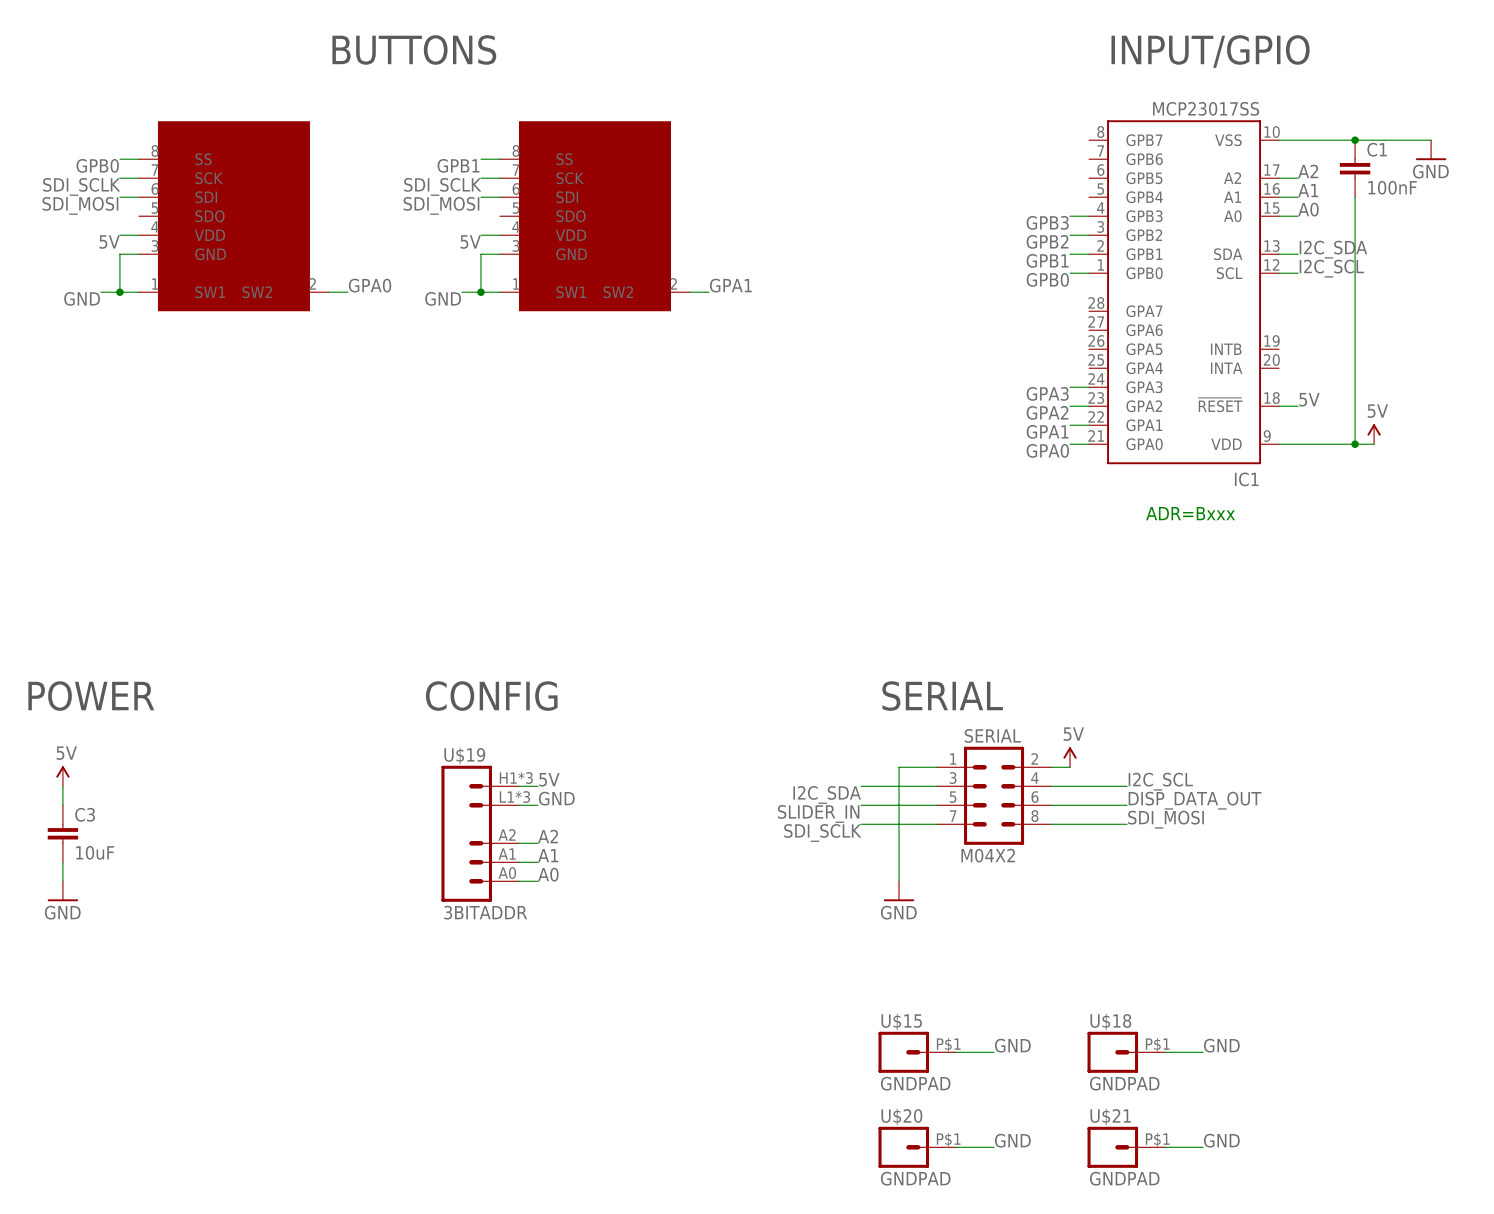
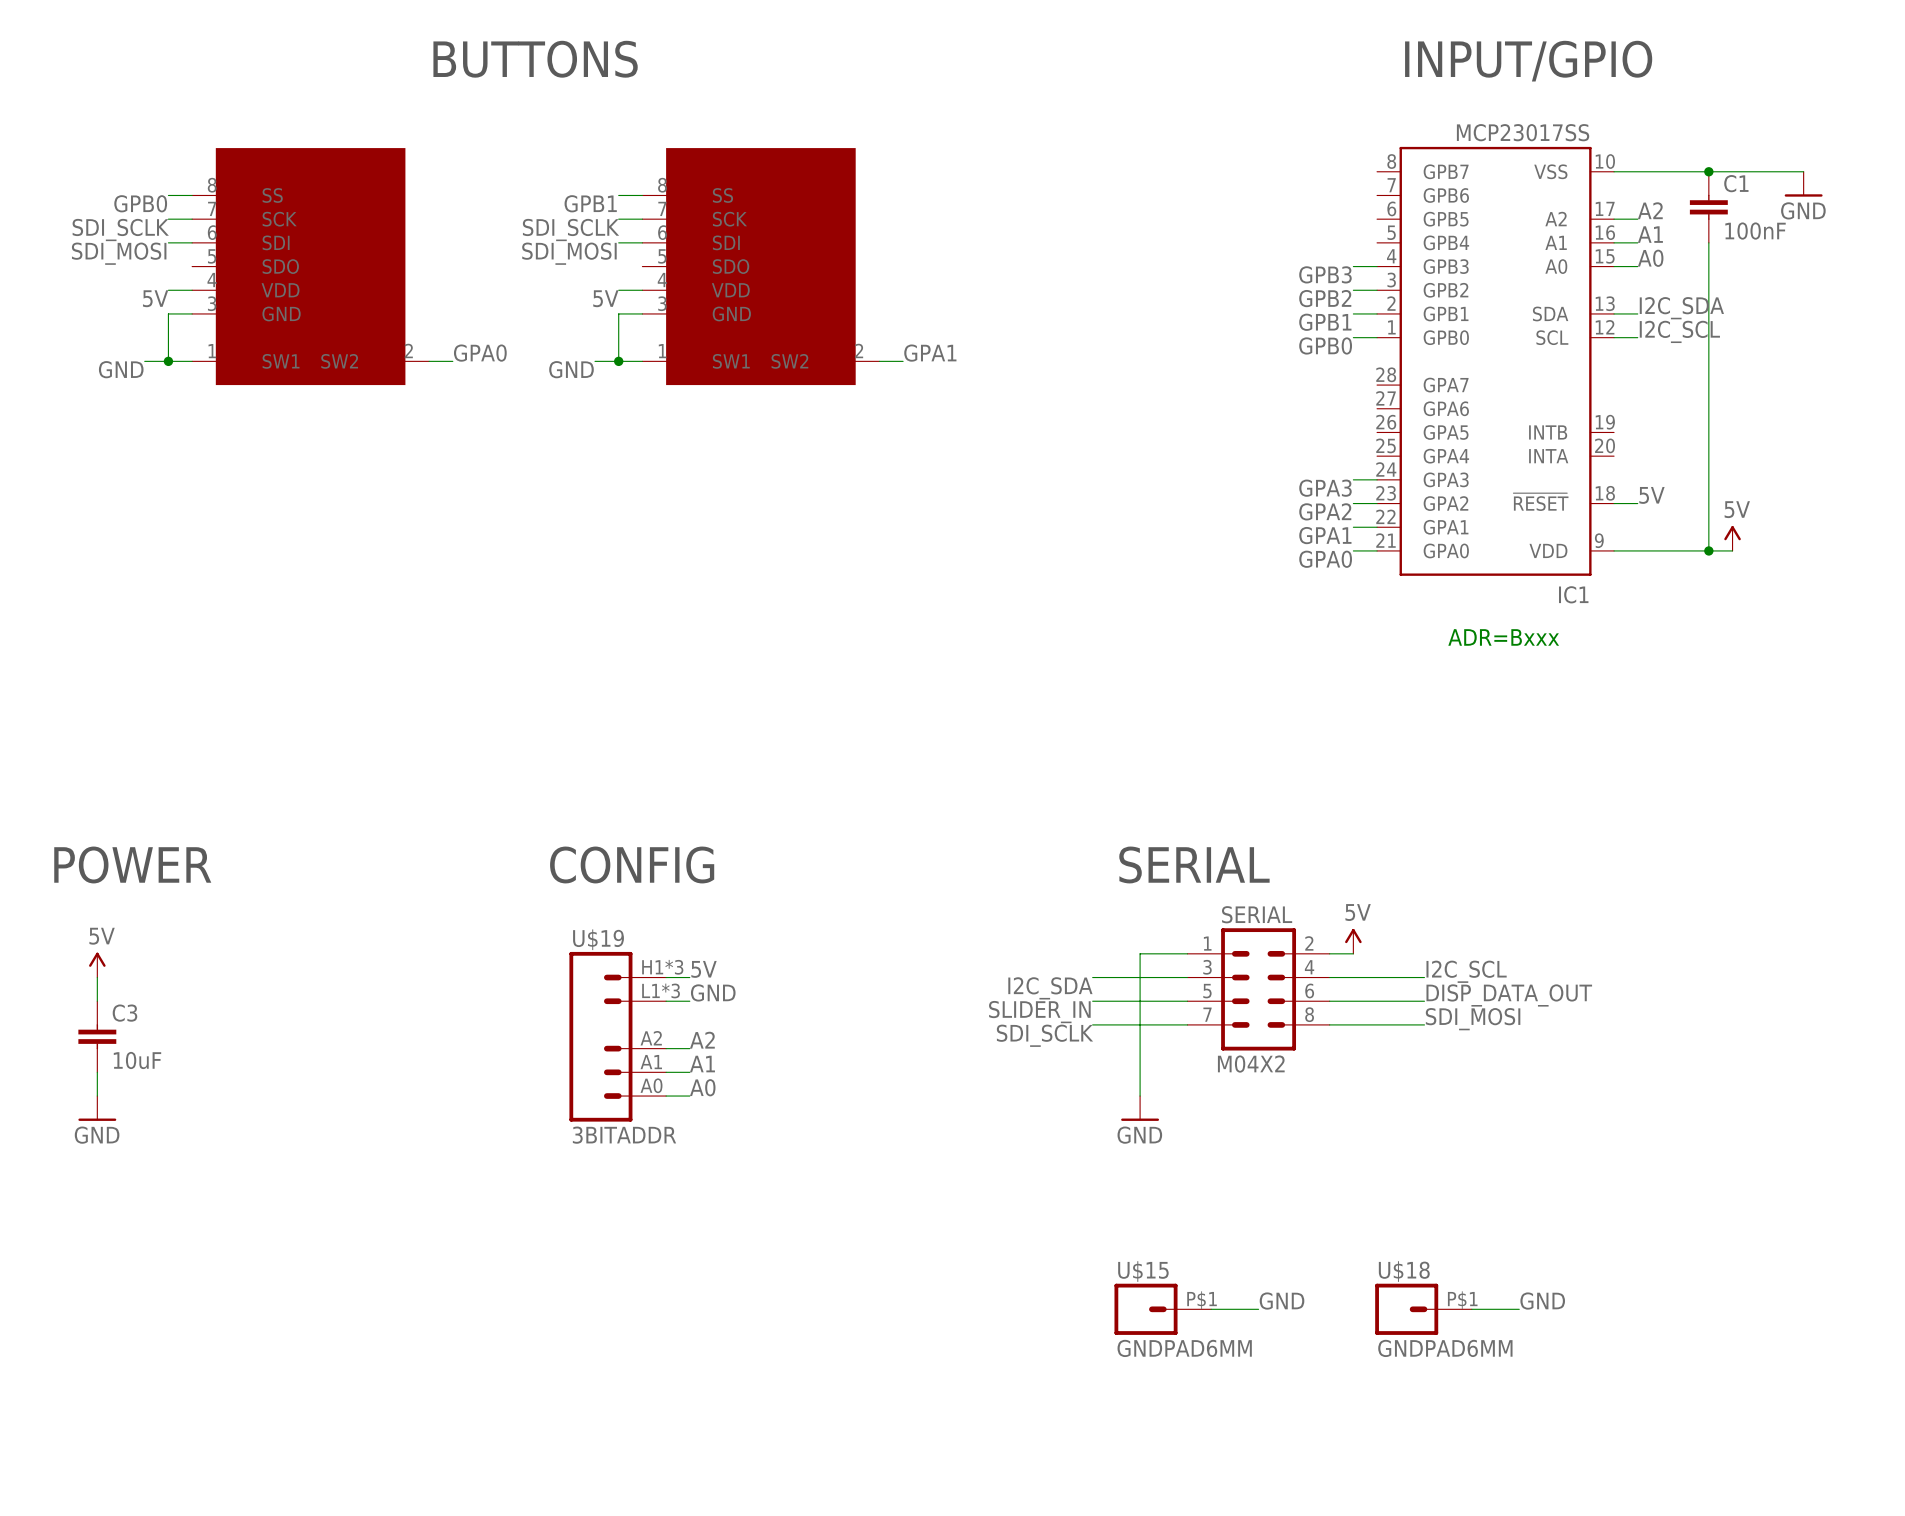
U$15 value: GNDPAD (915, 1083) -> GNDPAD6MM (1184, 1348)
U$18 value: GNDPAD (1124, 1083) -> GNDPAD6MM (1445, 1348)
label: GND (1012, 1140) -> none
label: GND (1221, 1140) -> none
U$20: GNDPAD (917, 1147) -> none
wire: (956, 1147) (994, 1147) -> none
U$21: GNDPAD (1126, 1147) -> none
wire: (1165, 1147) (1203, 1147) -> none

